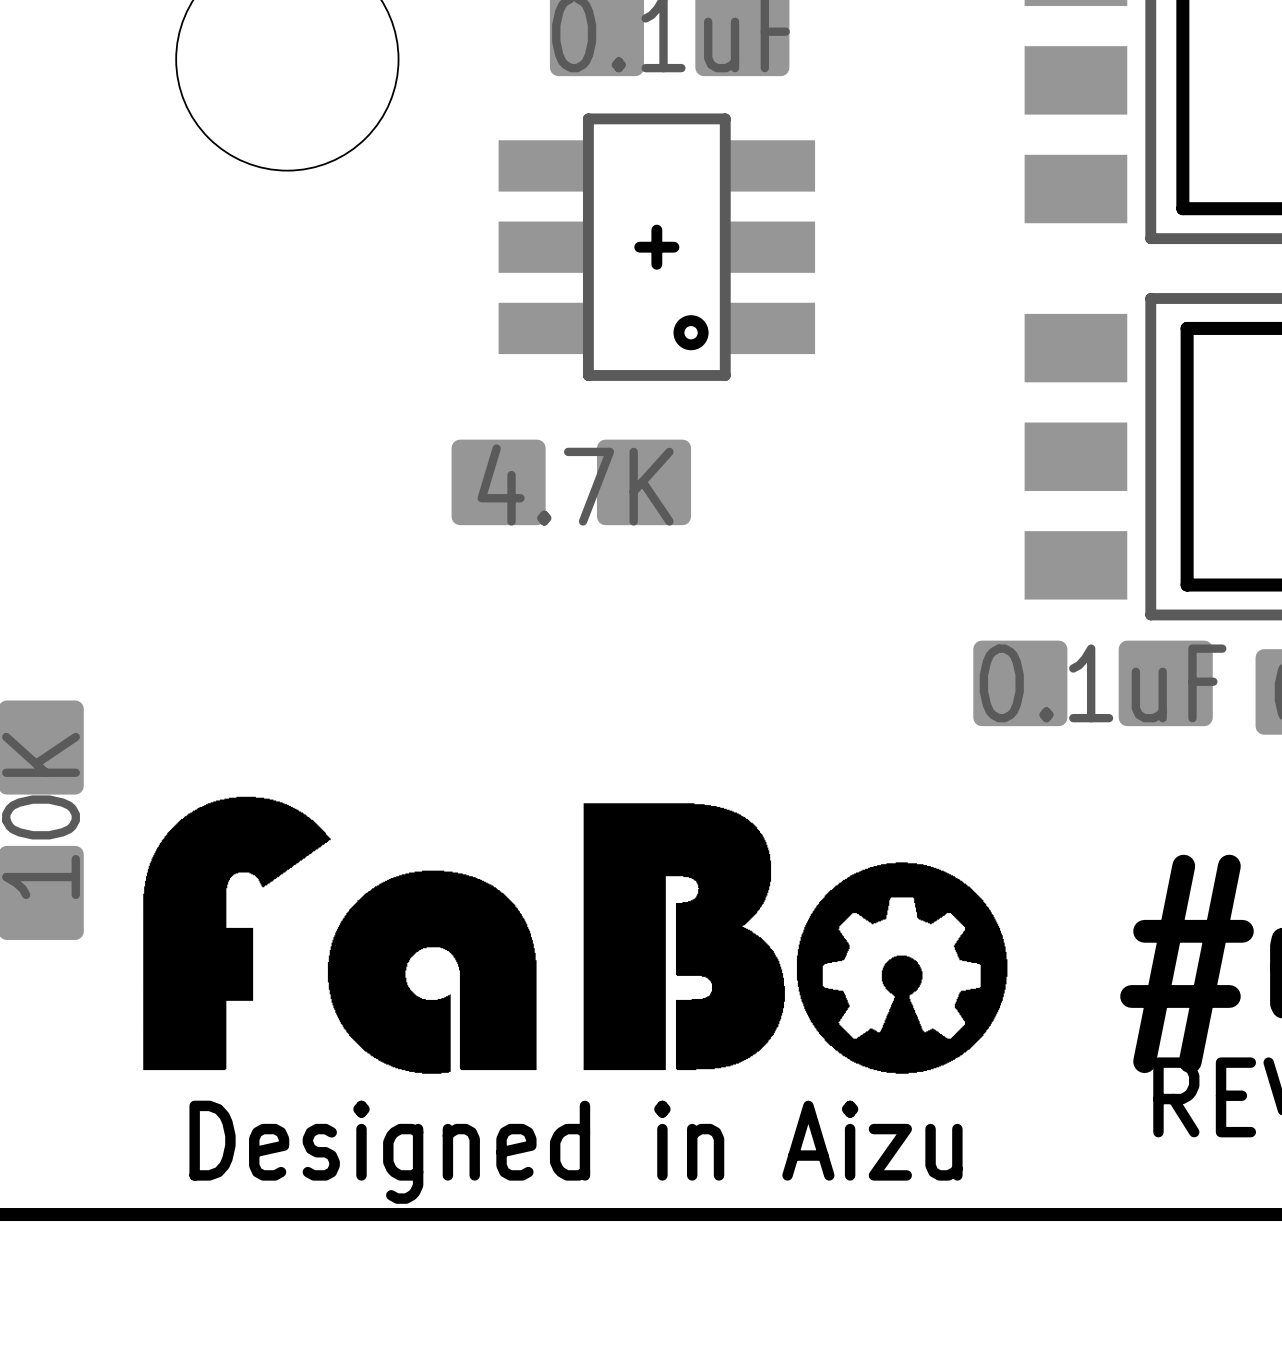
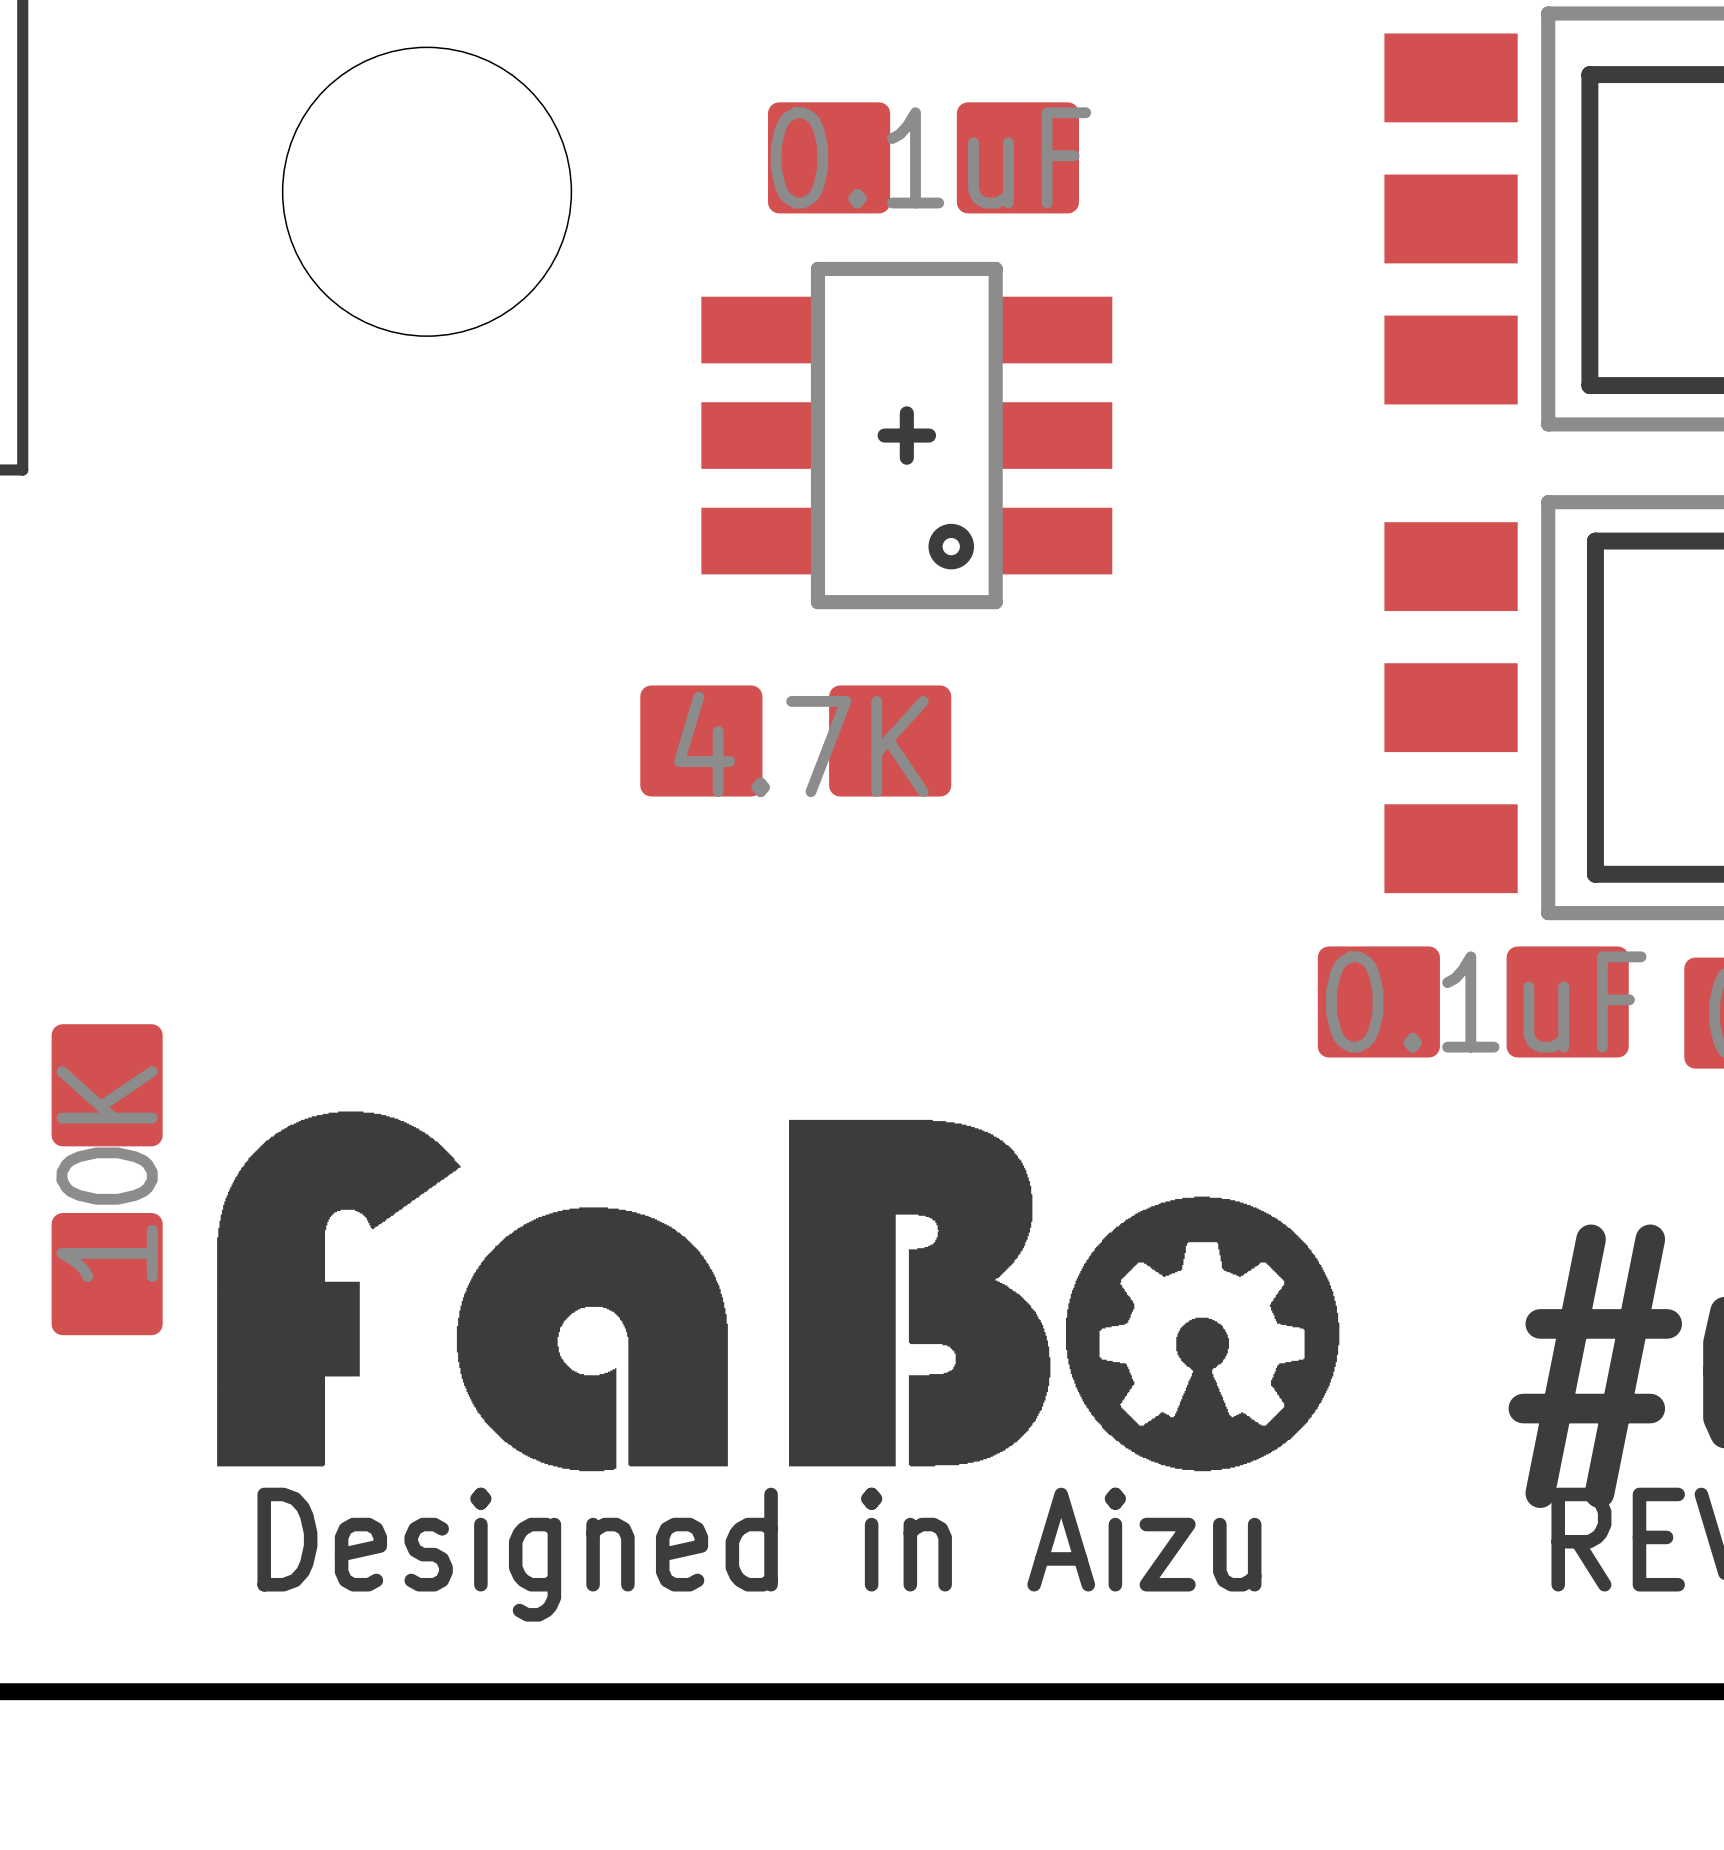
drawing position: (575, 935) -> (778, 1291)
text position: Designed in Aizu (576, 1152) -> Designed in Aizu (759, 1554)

